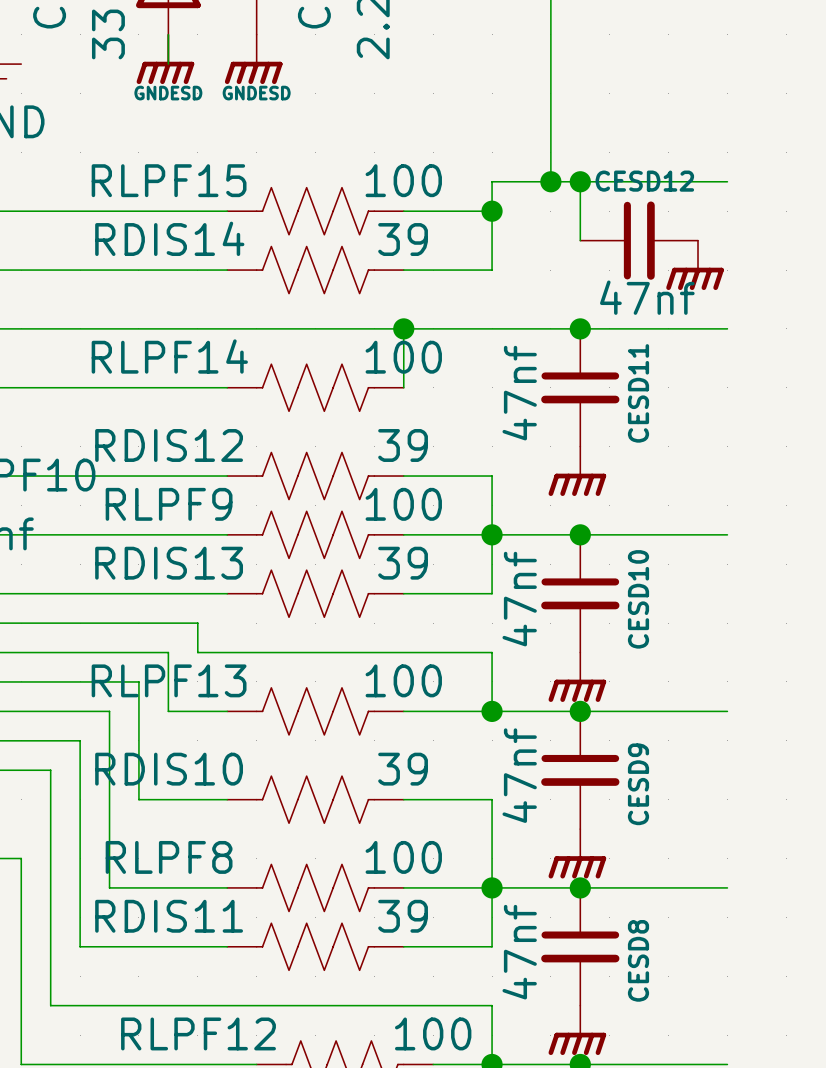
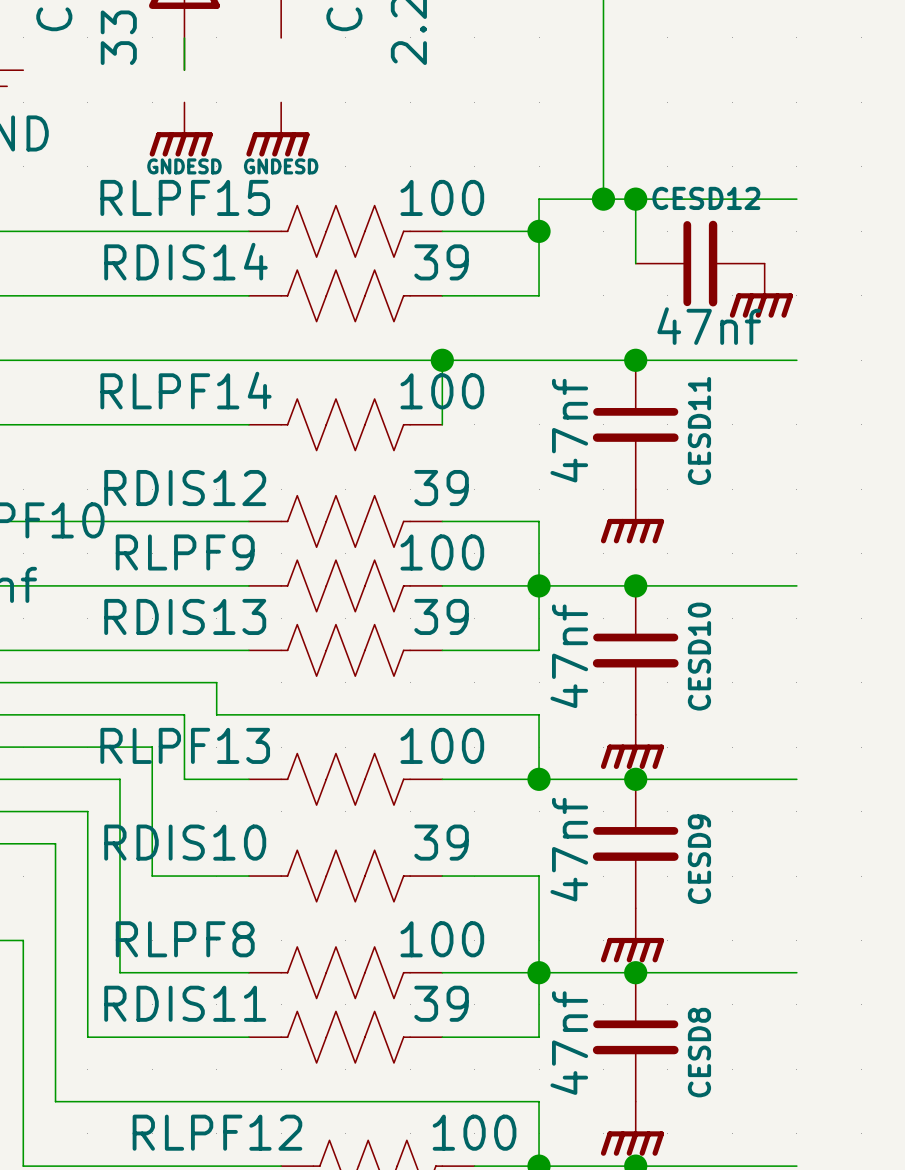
power symbol: GNDESD (165, 59) -> none
power symbol: GNDESD (253, 59) -> none
power symbol: none -> GNDESD (181, 129)
power symbol: none -> GNDESD (277, 129)

